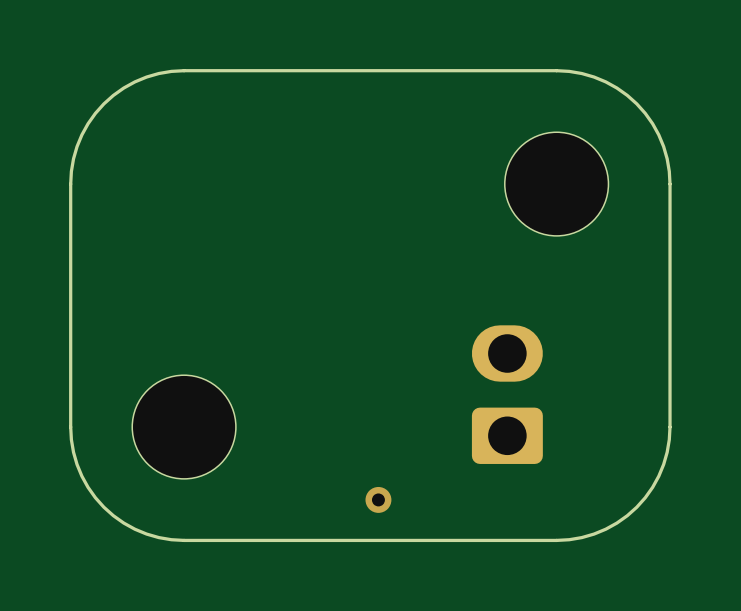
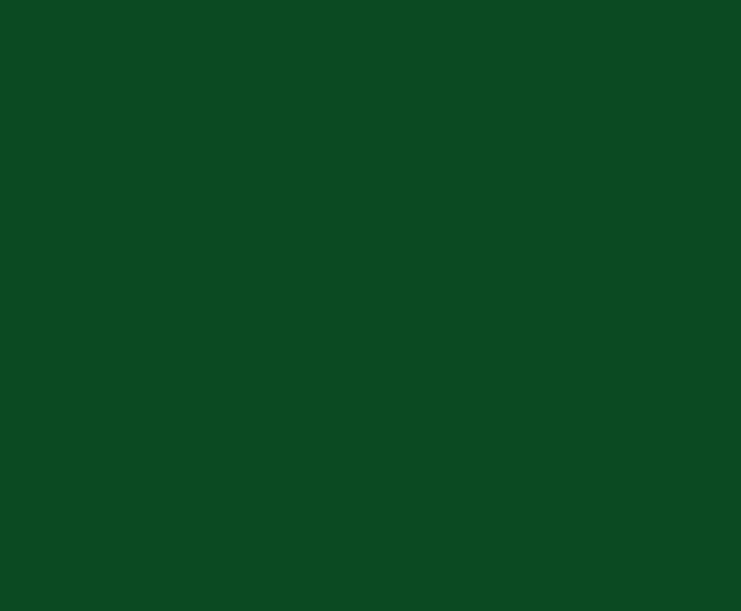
board edge: (556, 70) (171, 71) (134, 81) (103, 103) (81, 134) (73, 158) (70, 184) (71, 439) (81, 476) (103, 507) (123, 523) (146, 534) (184, 540) (569, 539) (605, 529) (636, 507) (658, 476) (669, 439) (670, 184) (667, 158) (652, 123) (627, 95) (594, 77) (556, 70) -> none
part: (556, 184) -> none
part: (507, 394) -> none
part: (184, 427) -> none
via: (378, 499) -> none

